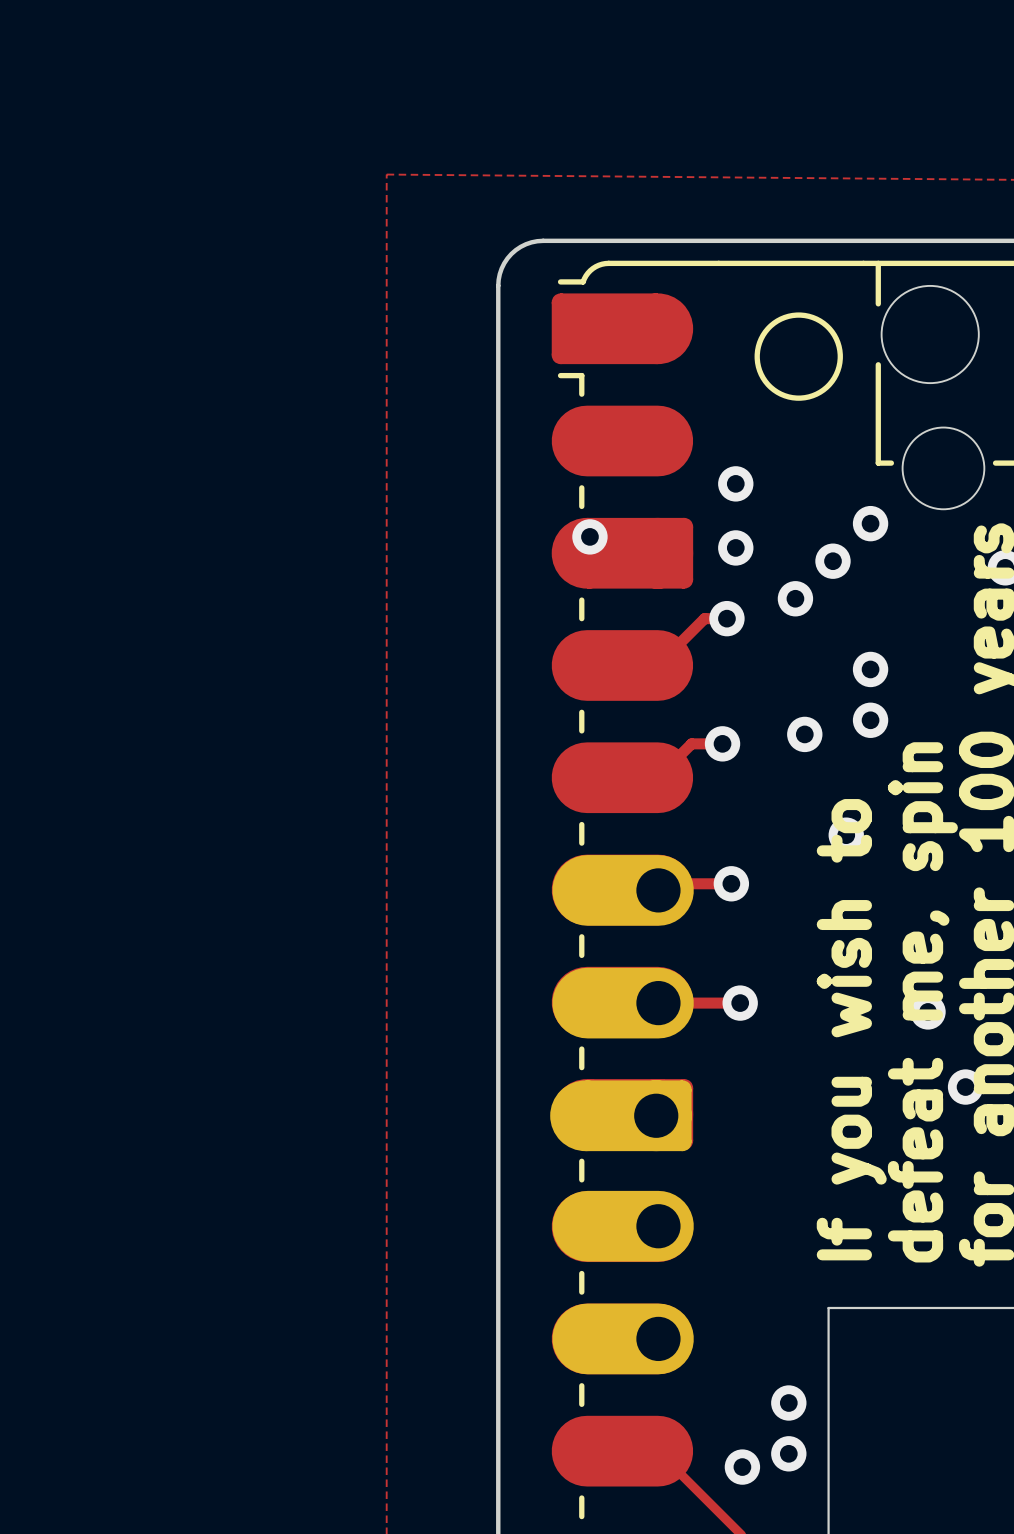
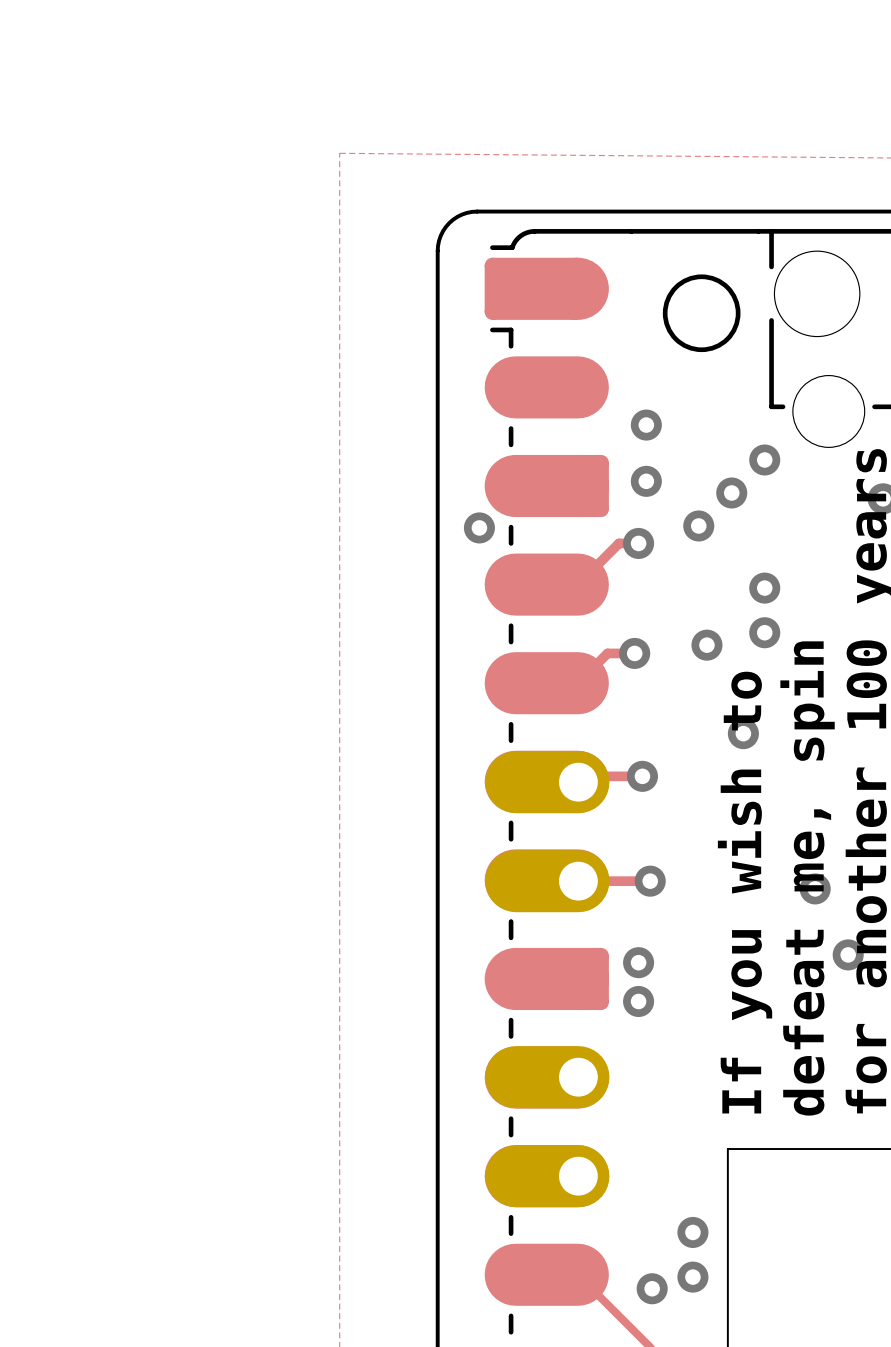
via position: (589, 536) -> (479, 527)
via: none -> (638, 962)
part: (620, 1115) -> none
via: none -> (638, 1001)

